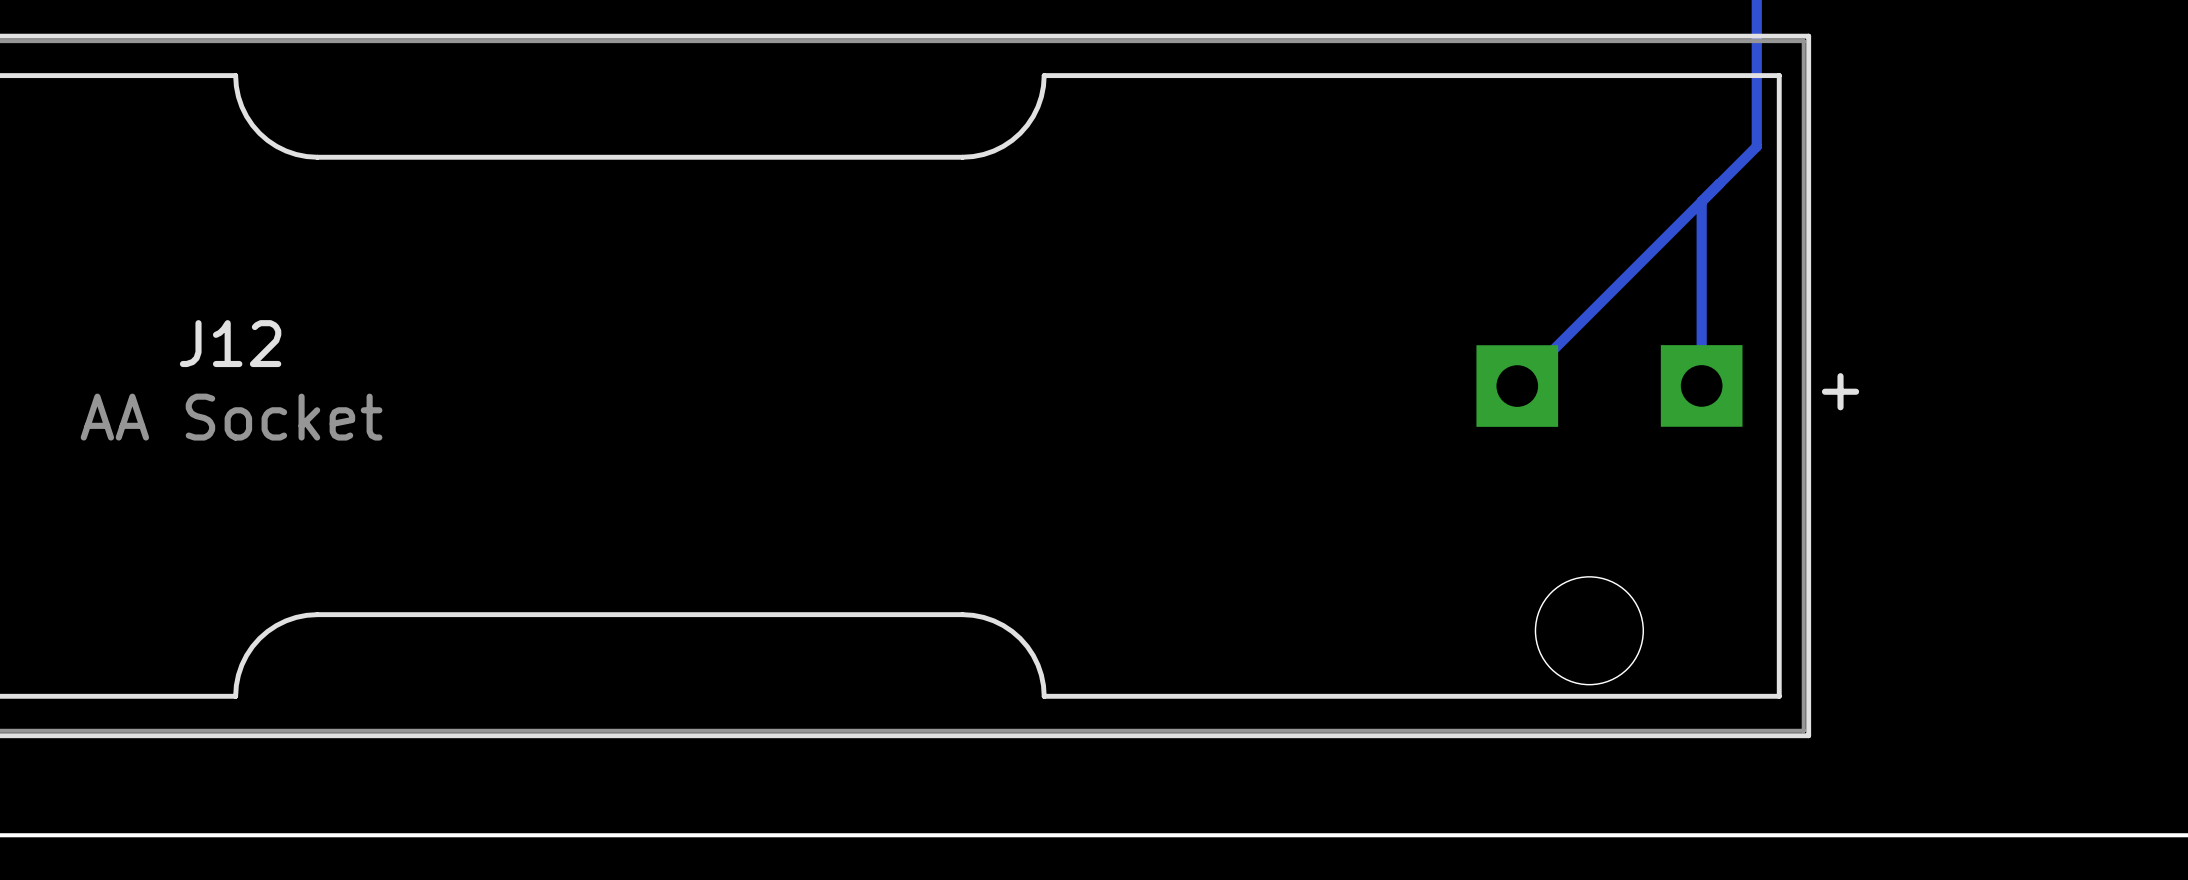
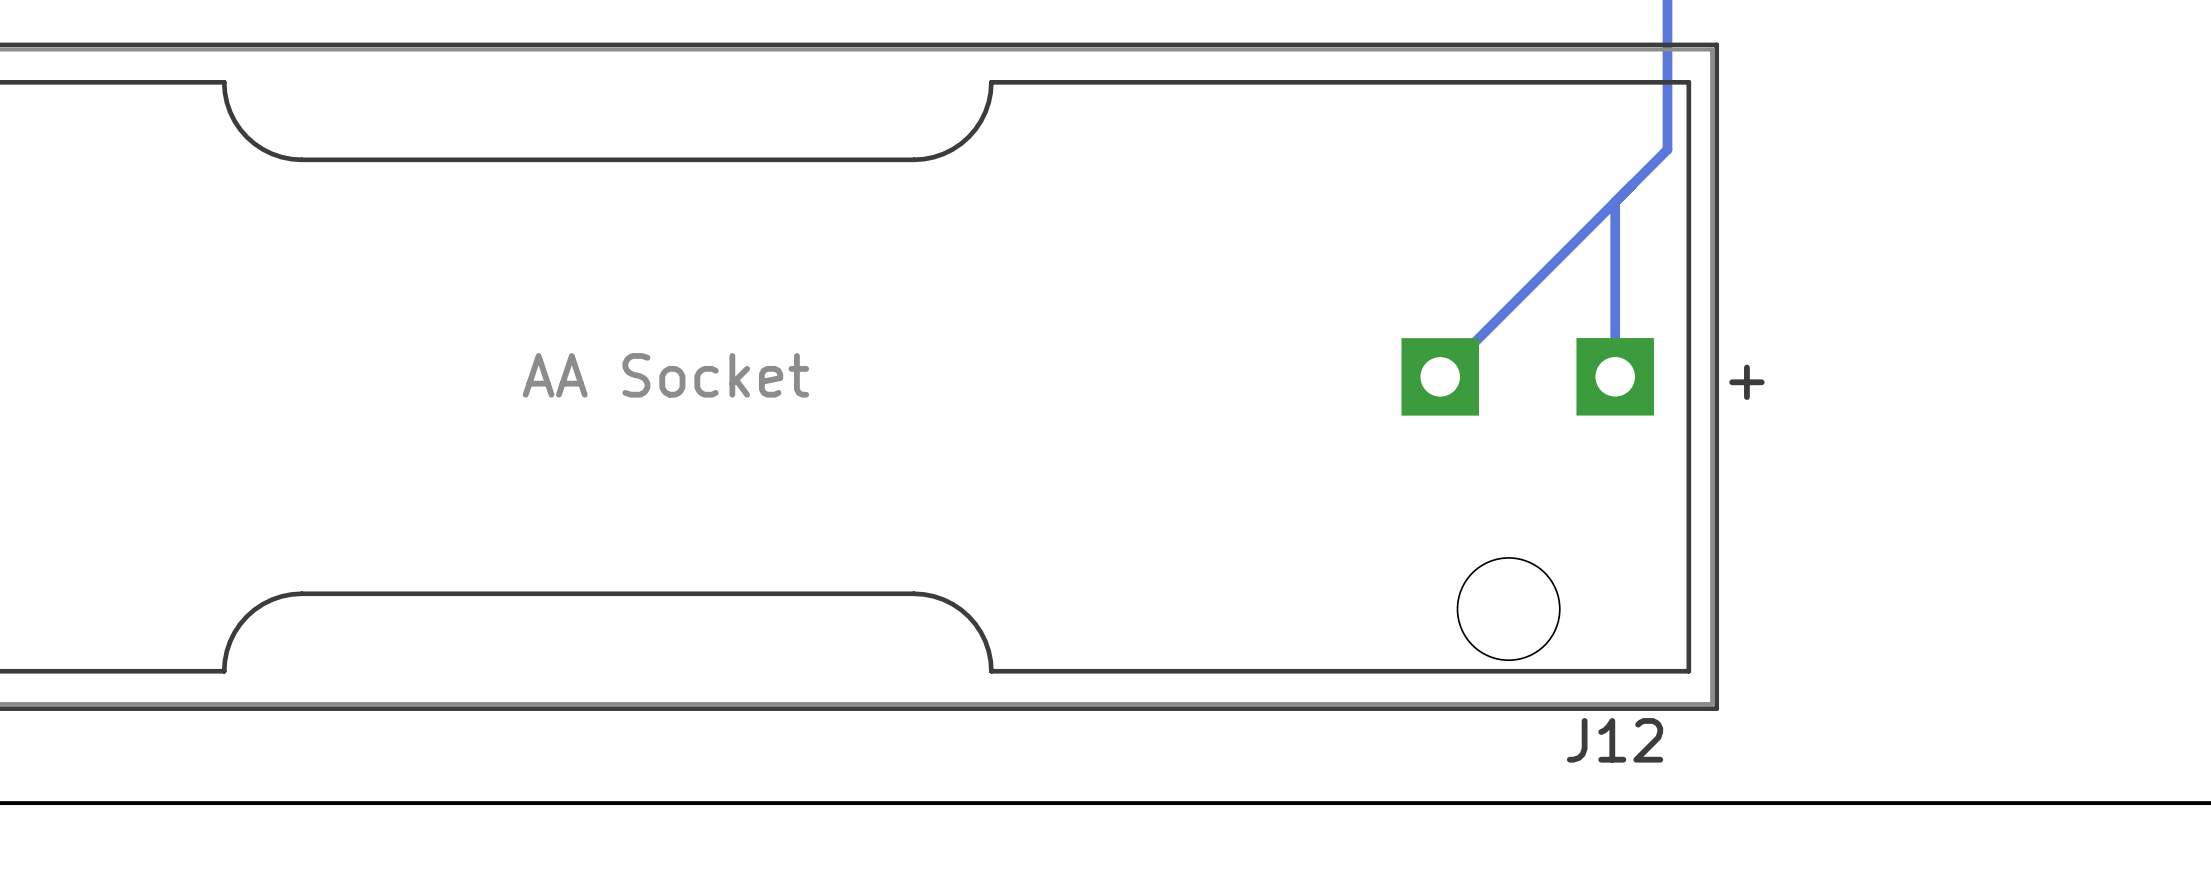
J12 name position: J12 (230, 343) -> J12 (1615, 740)
J12 value position: AA Socket (231, 417) -> AA Socket (665, 375)

